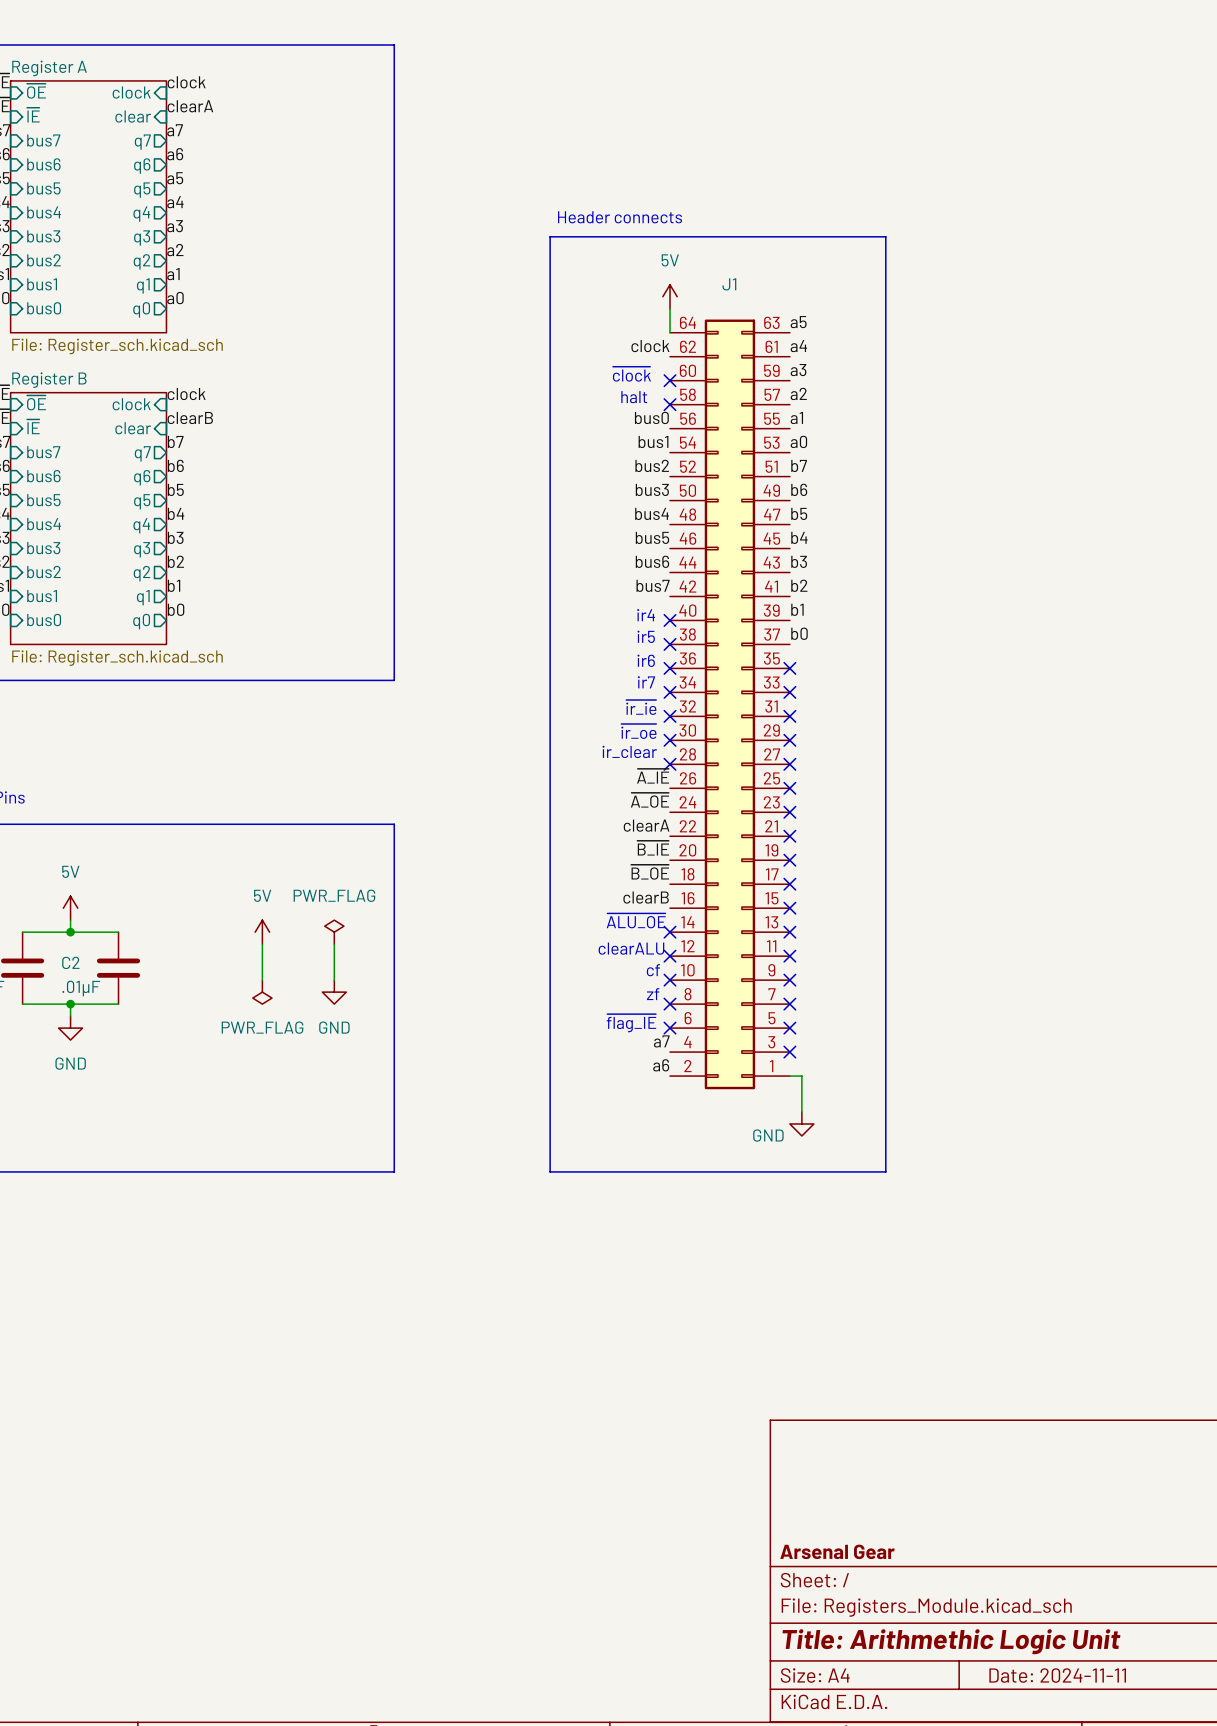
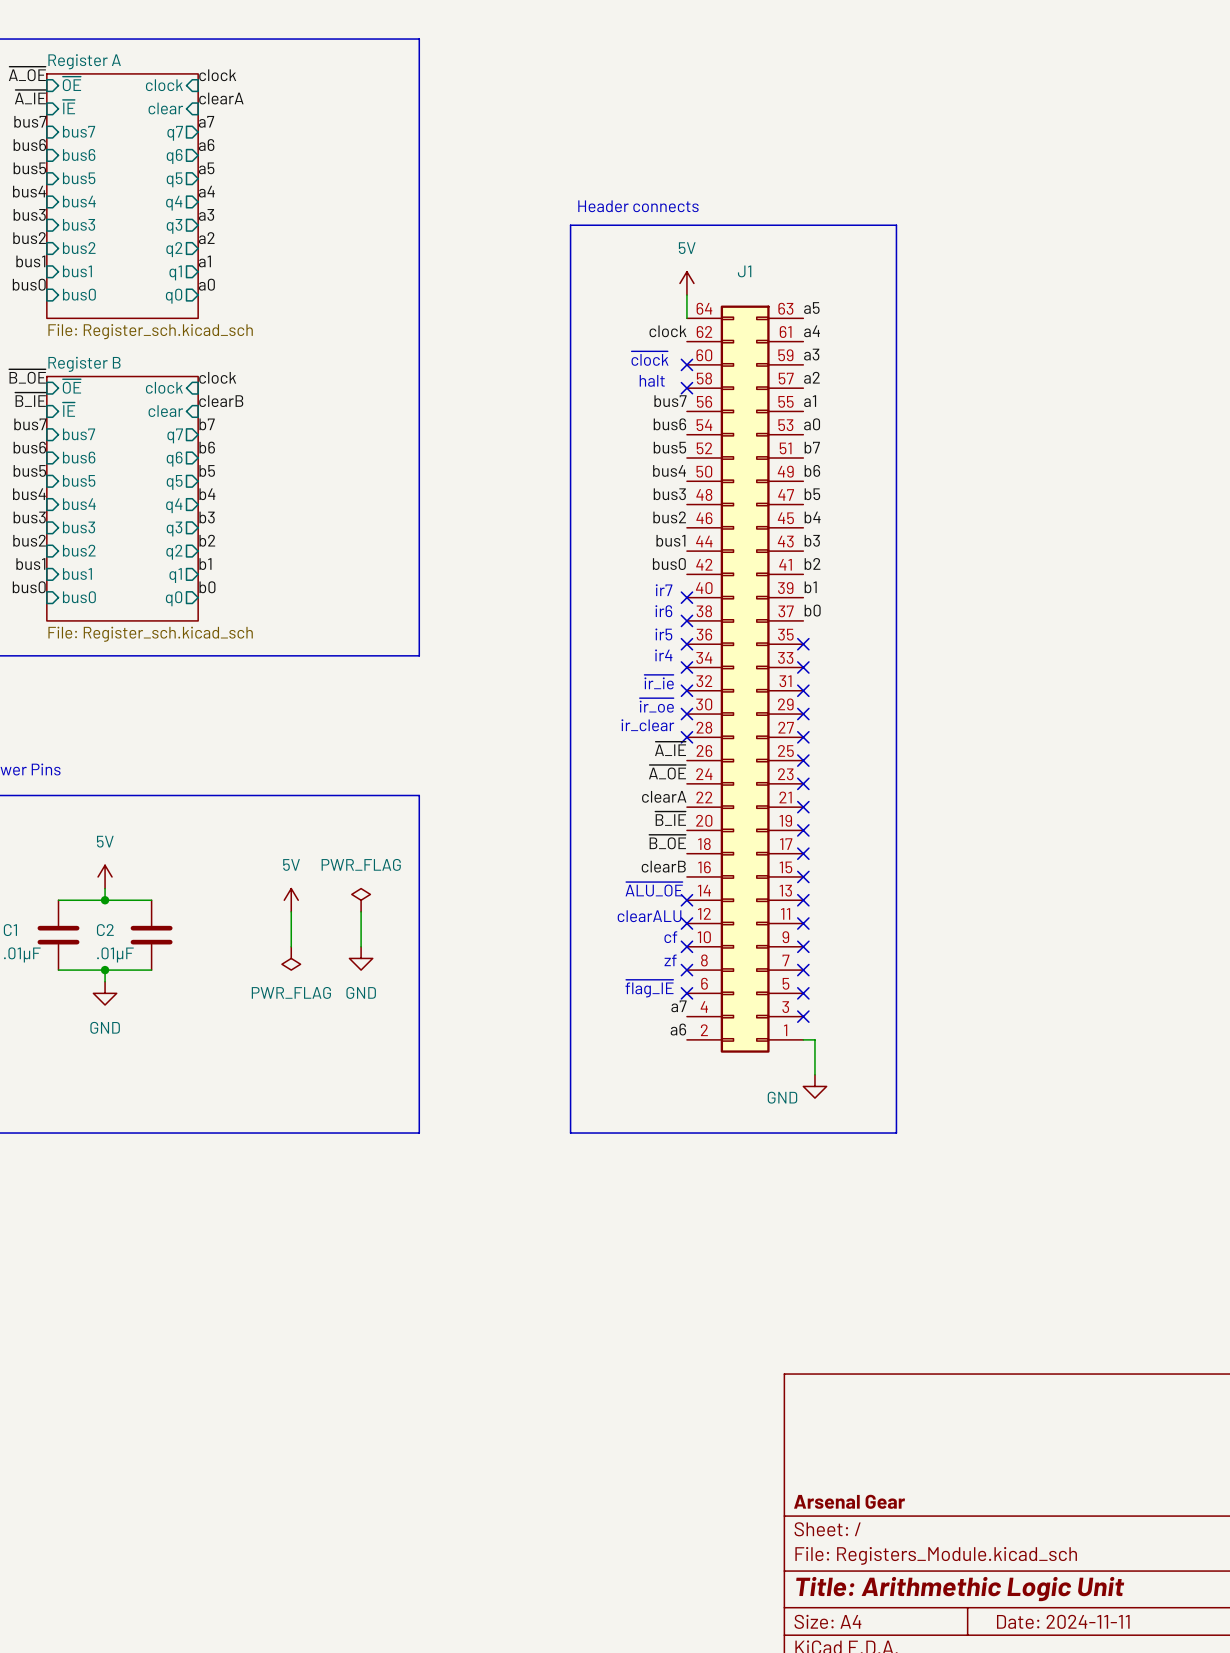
label: bus0 (651, 417) -> bus7 (670, 401)
label: bus1 (653, 441) -> bus6 (669, 424)
label: bus2 (652, 465) -> bus5 (669, 447)
label: bus3 (652, 489) -> bus4 (669, 470)
label: bus4 (652, 513) -> bus3 (669, 494)
label: bus5 (652, 537) -> bus2 (669, 517)
label: bus6 (652, 561) -> bus1 (670, 540)
label: bus7 (653, 585) -> bus0 (669, 564)
text: ir4 (646, 615) -> ir7 (664, 590)
text: ir5 (646, 636) -> ir6 (663, 611)
text: ir6 (646, 660) -> ir5 (663, 634)
text: ir7 (646, 682) -> ir4 (663, 655)

